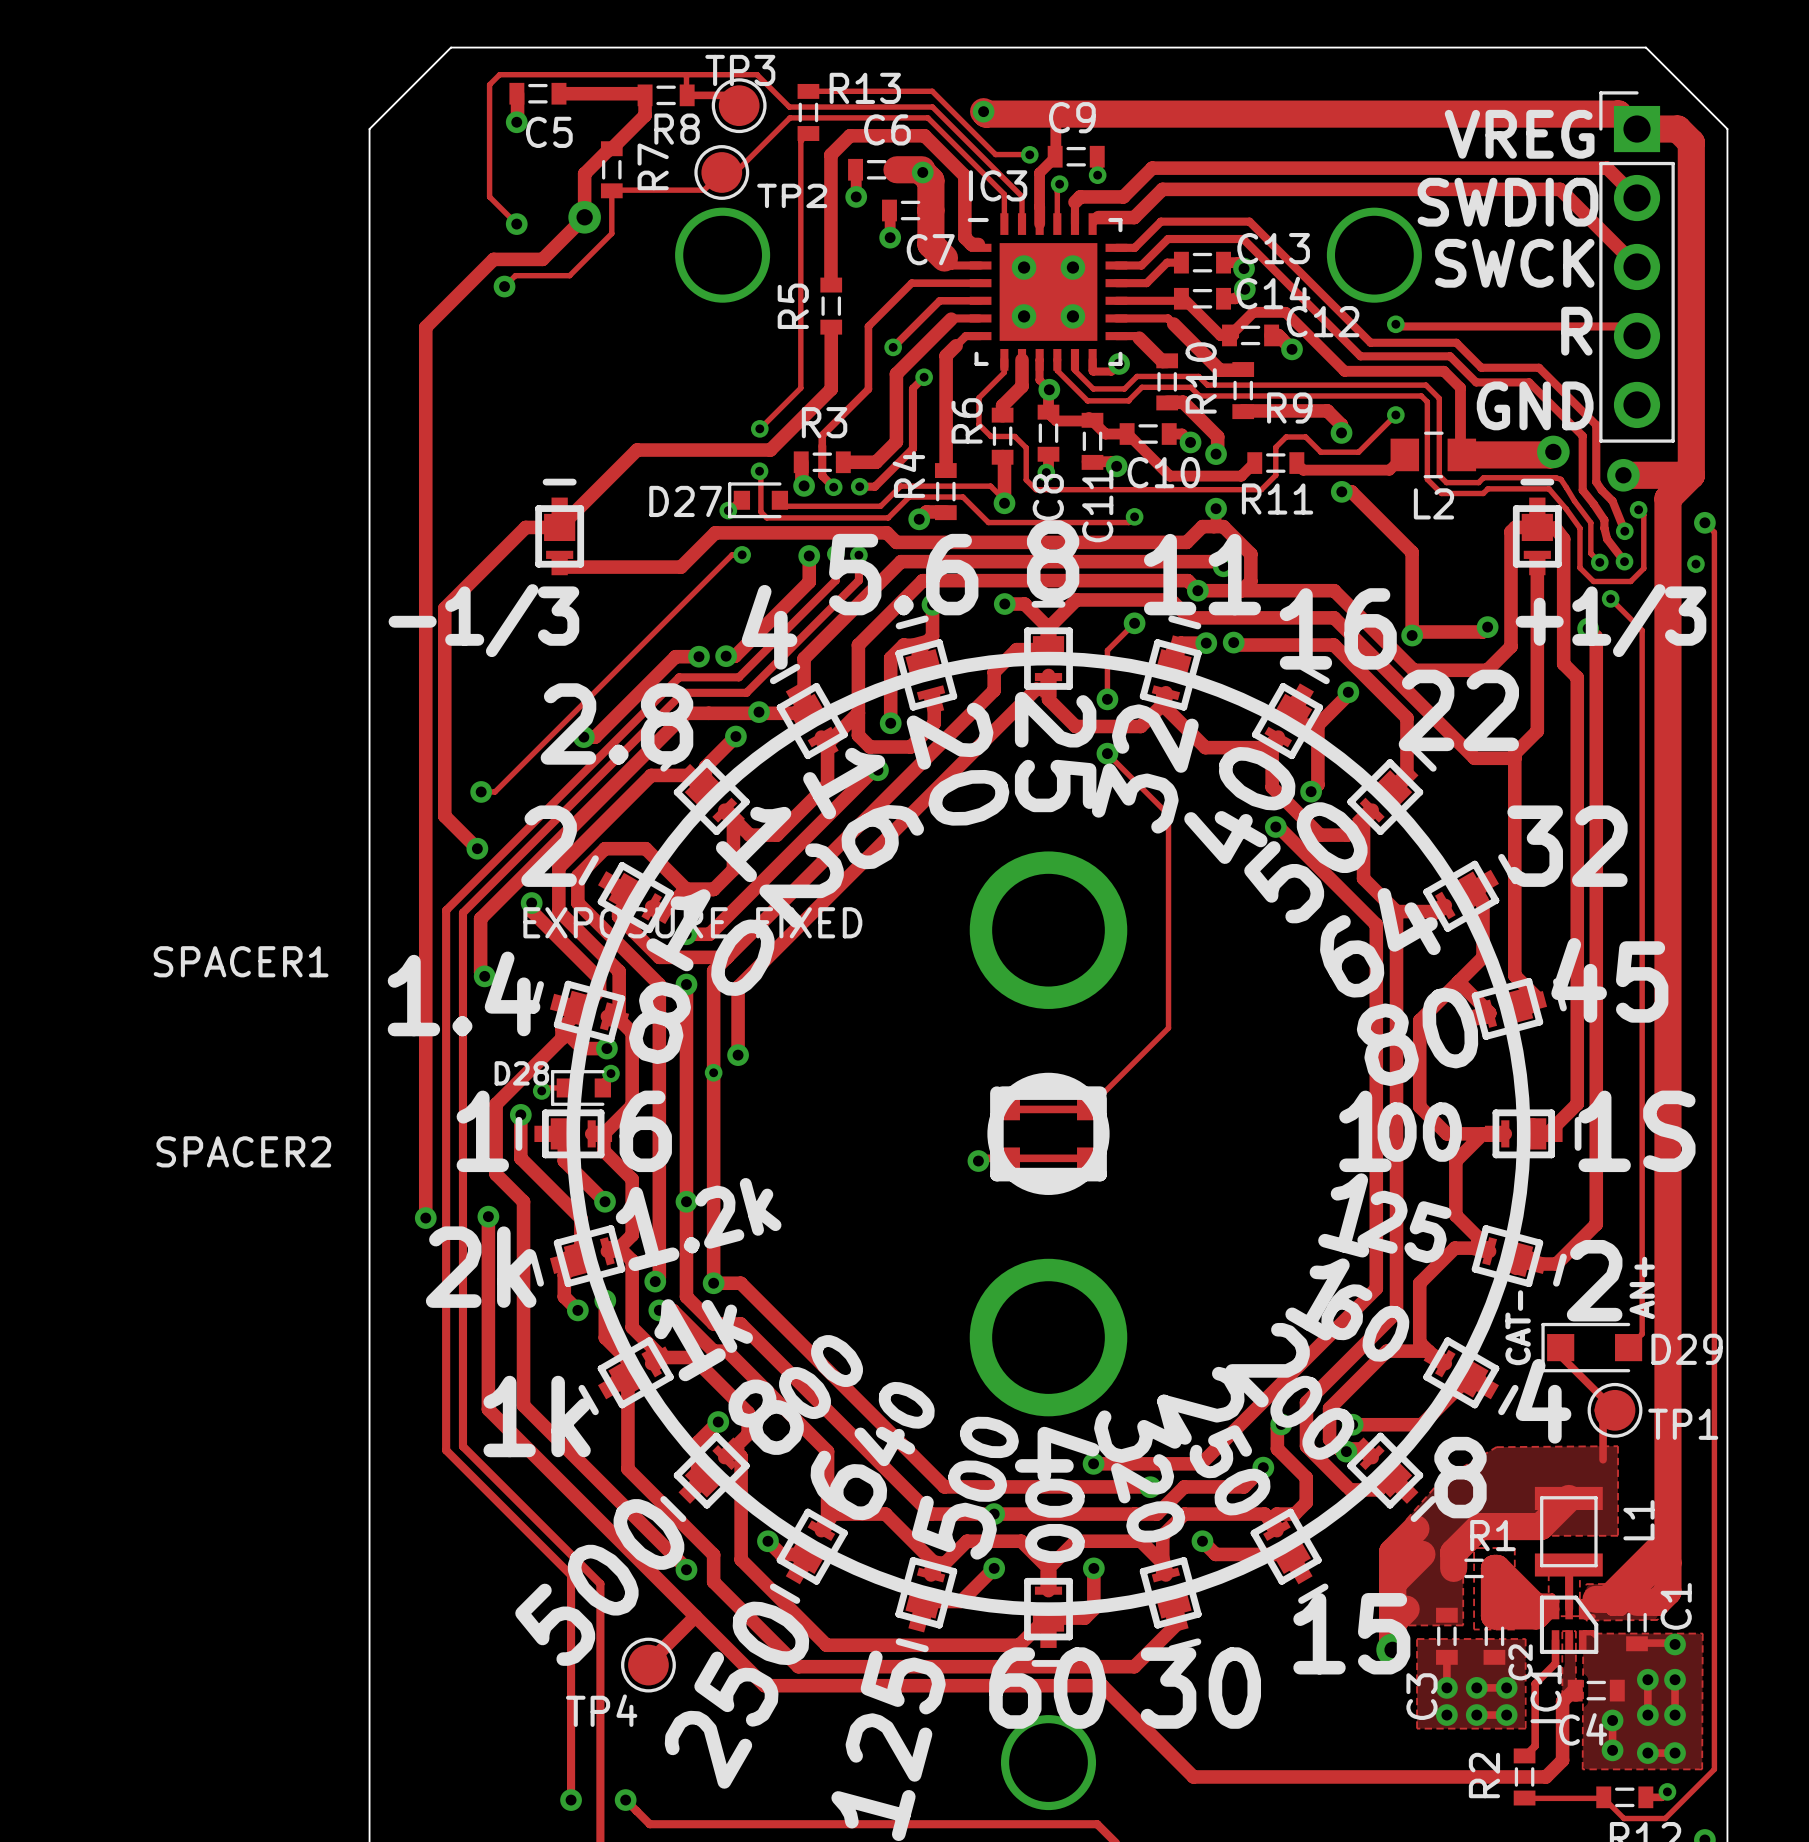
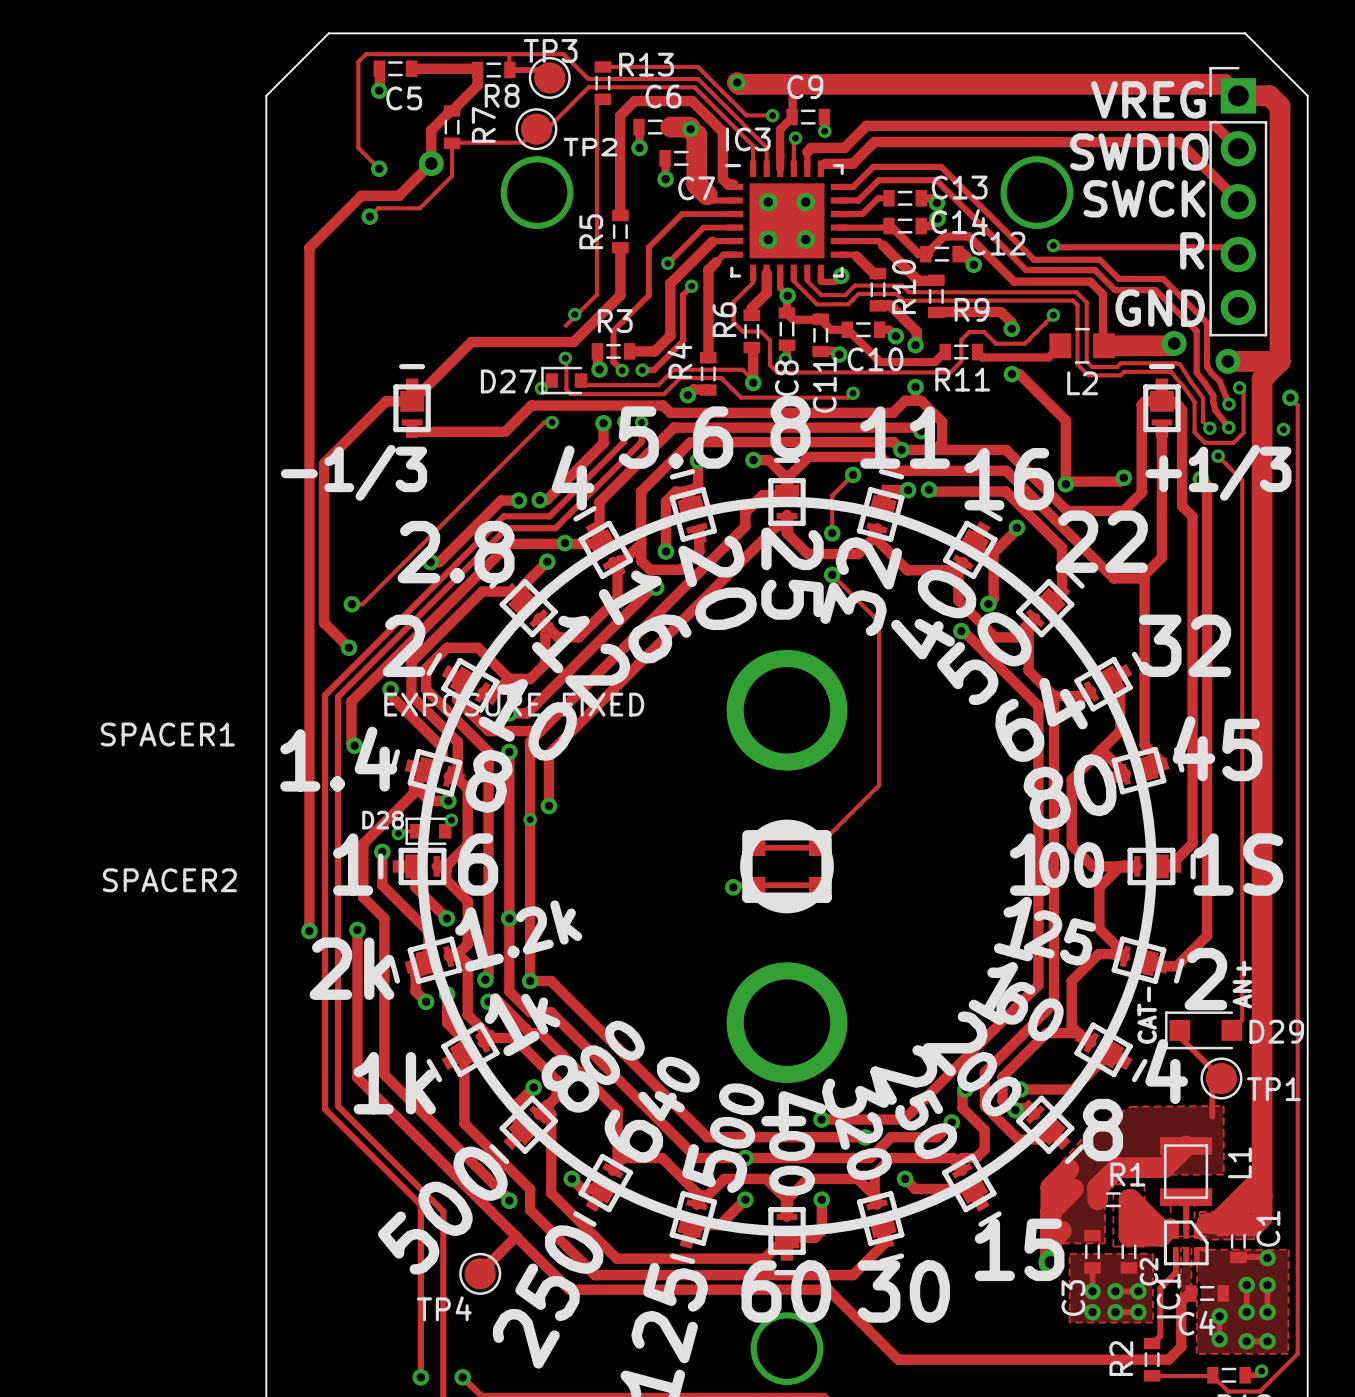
via position: (759, 428) -> (574, 314)

